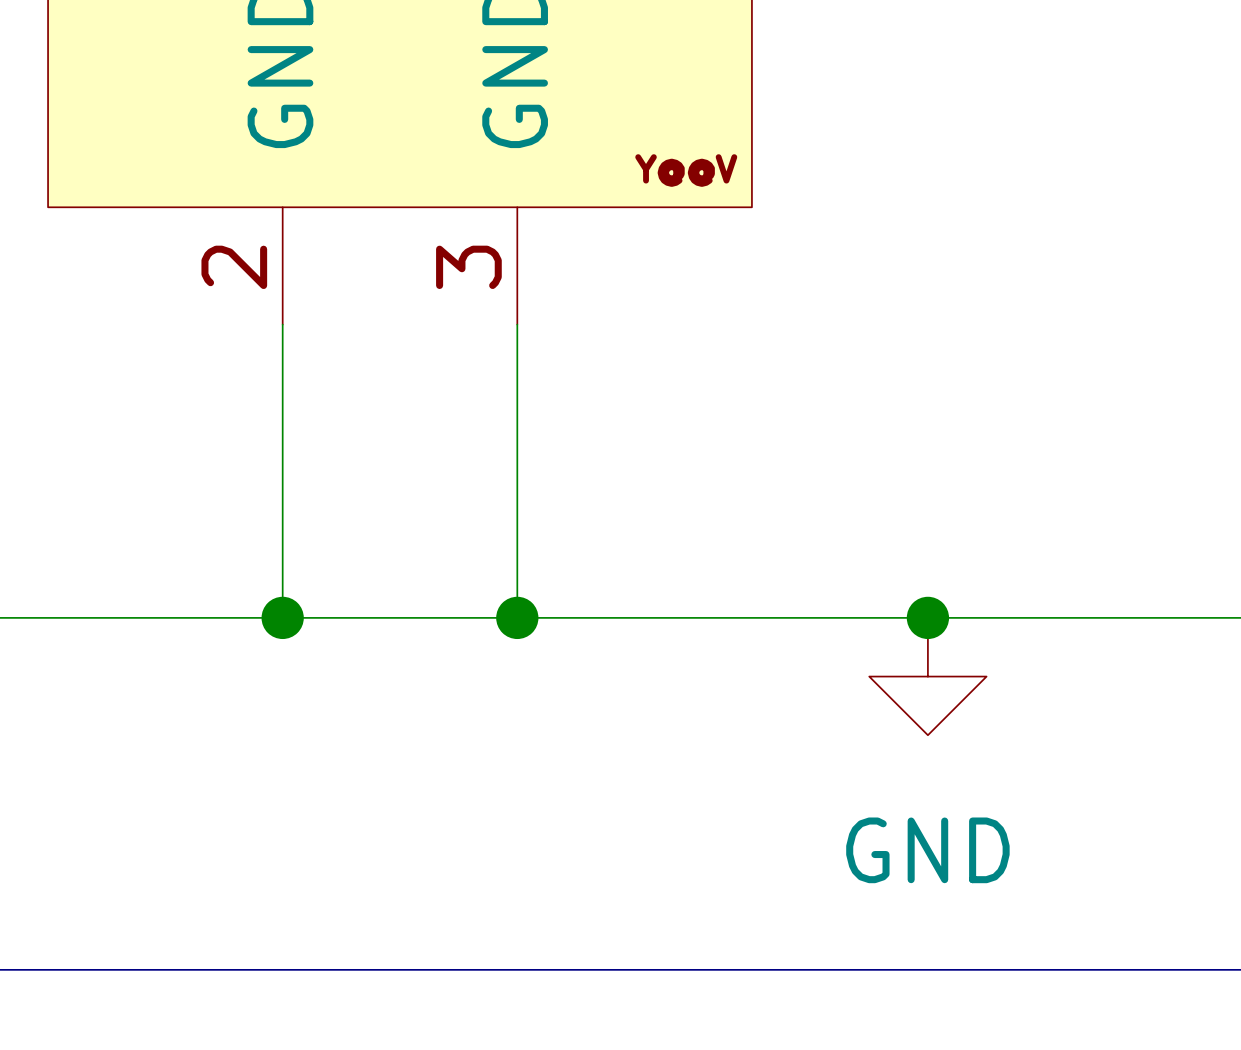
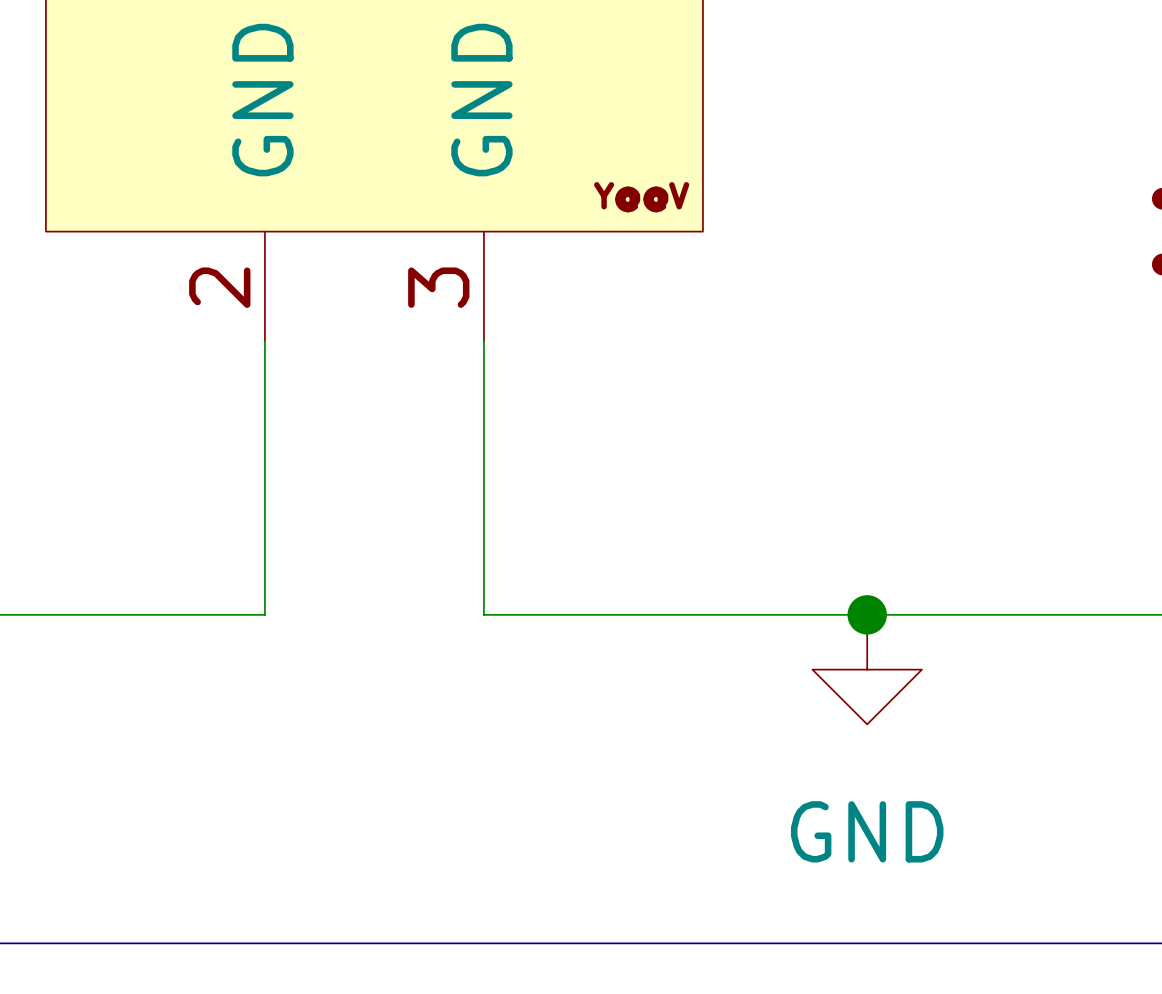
wire: (282, 617) (517, 617) -> none
junction: (282, 617) -> none
junction: (517, 617) -> none

